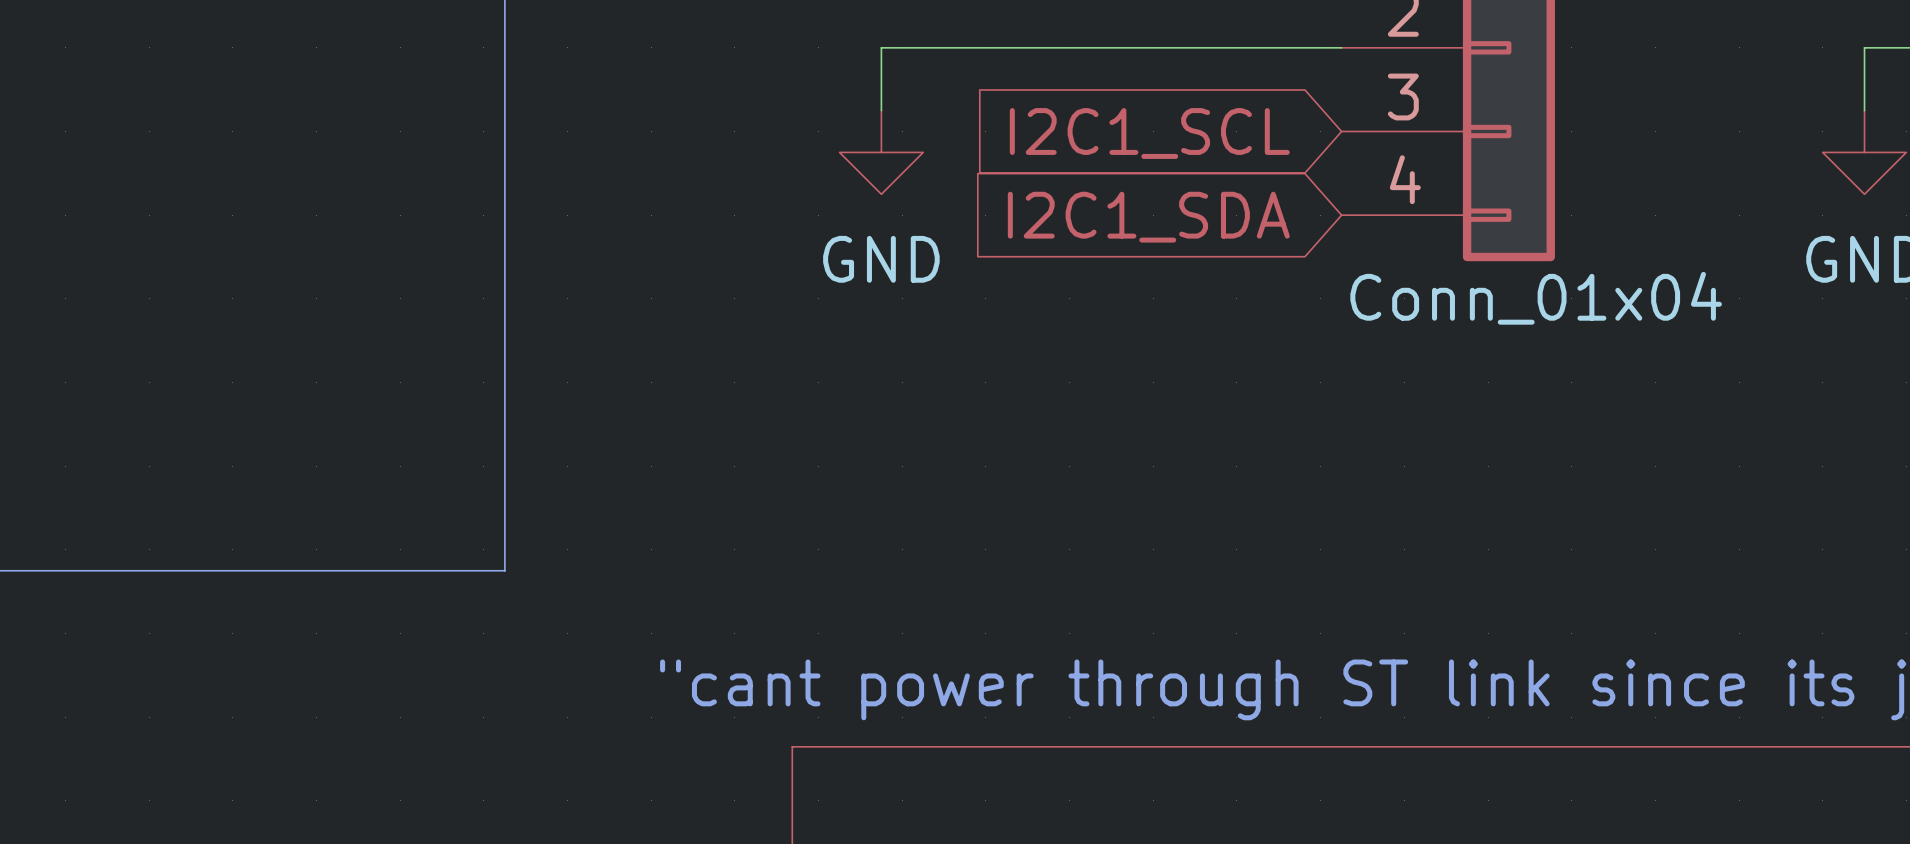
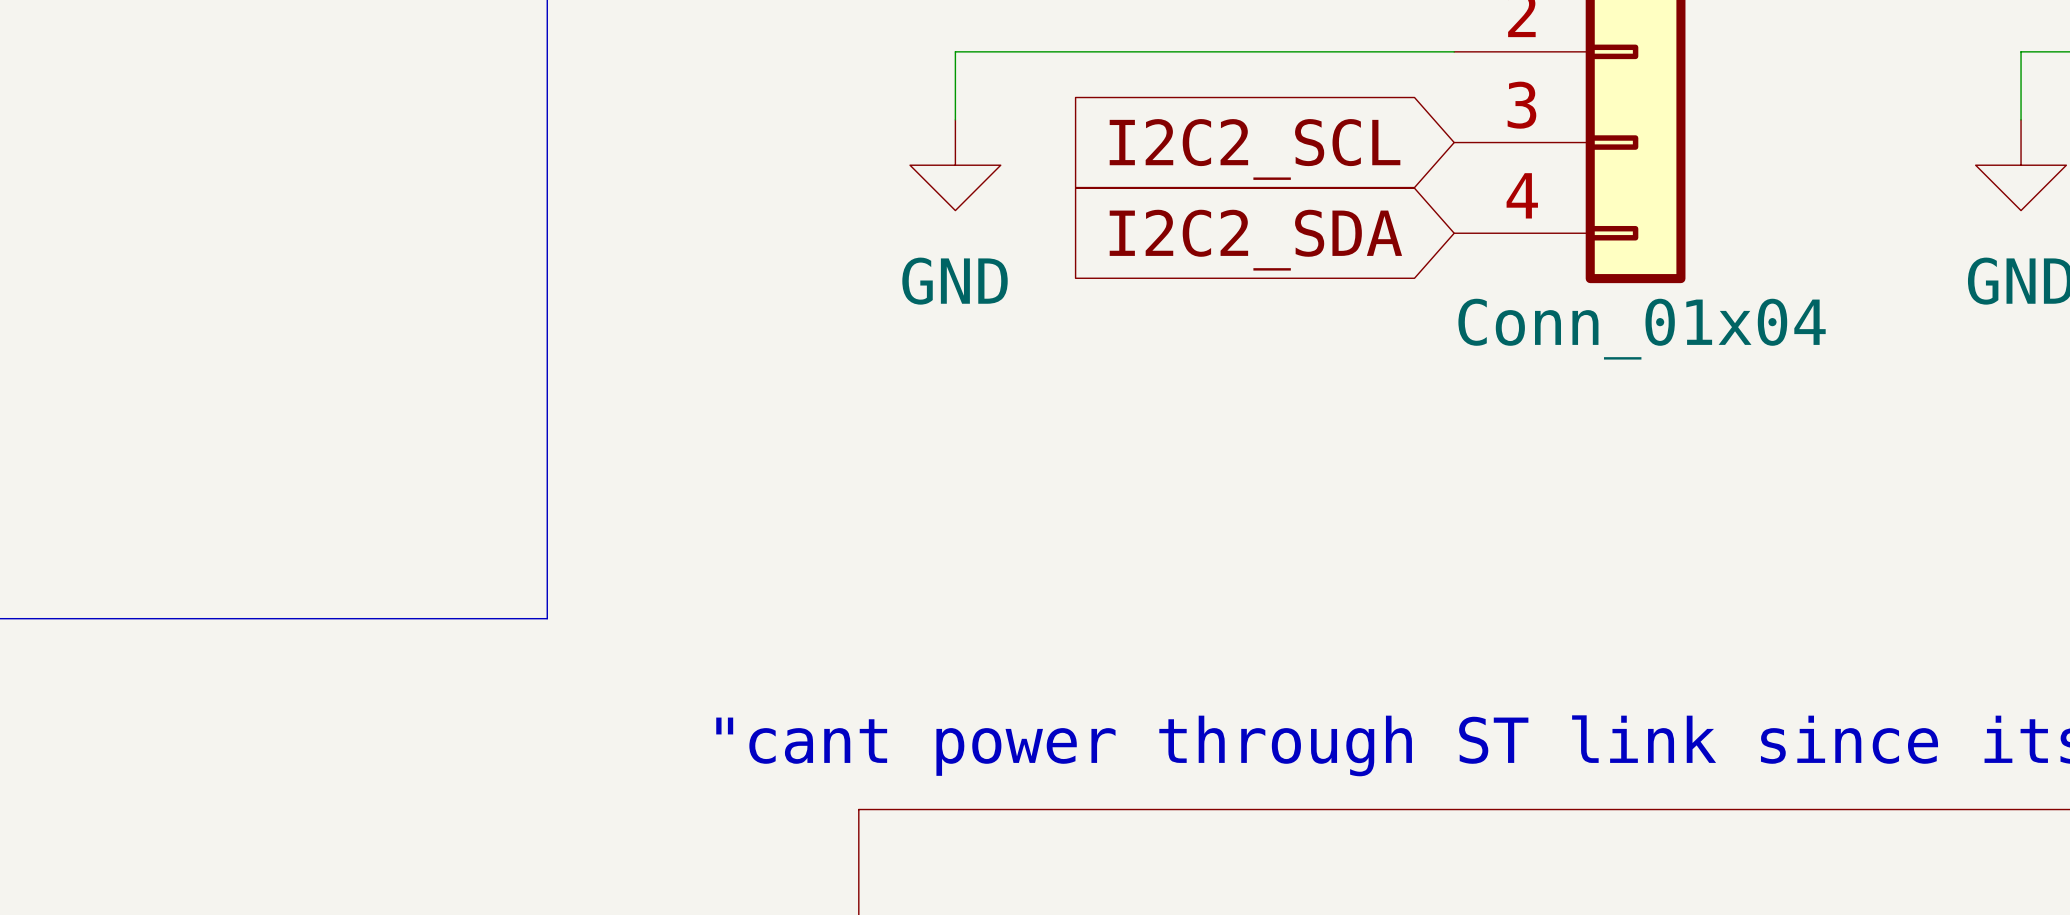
global label: I2C1_SCL (1149, 133) -> I2C2_SCL (1255, 149)
global label: I2C1_SDA (1148, 217) -> I2C2_SDA (1255, 240)

